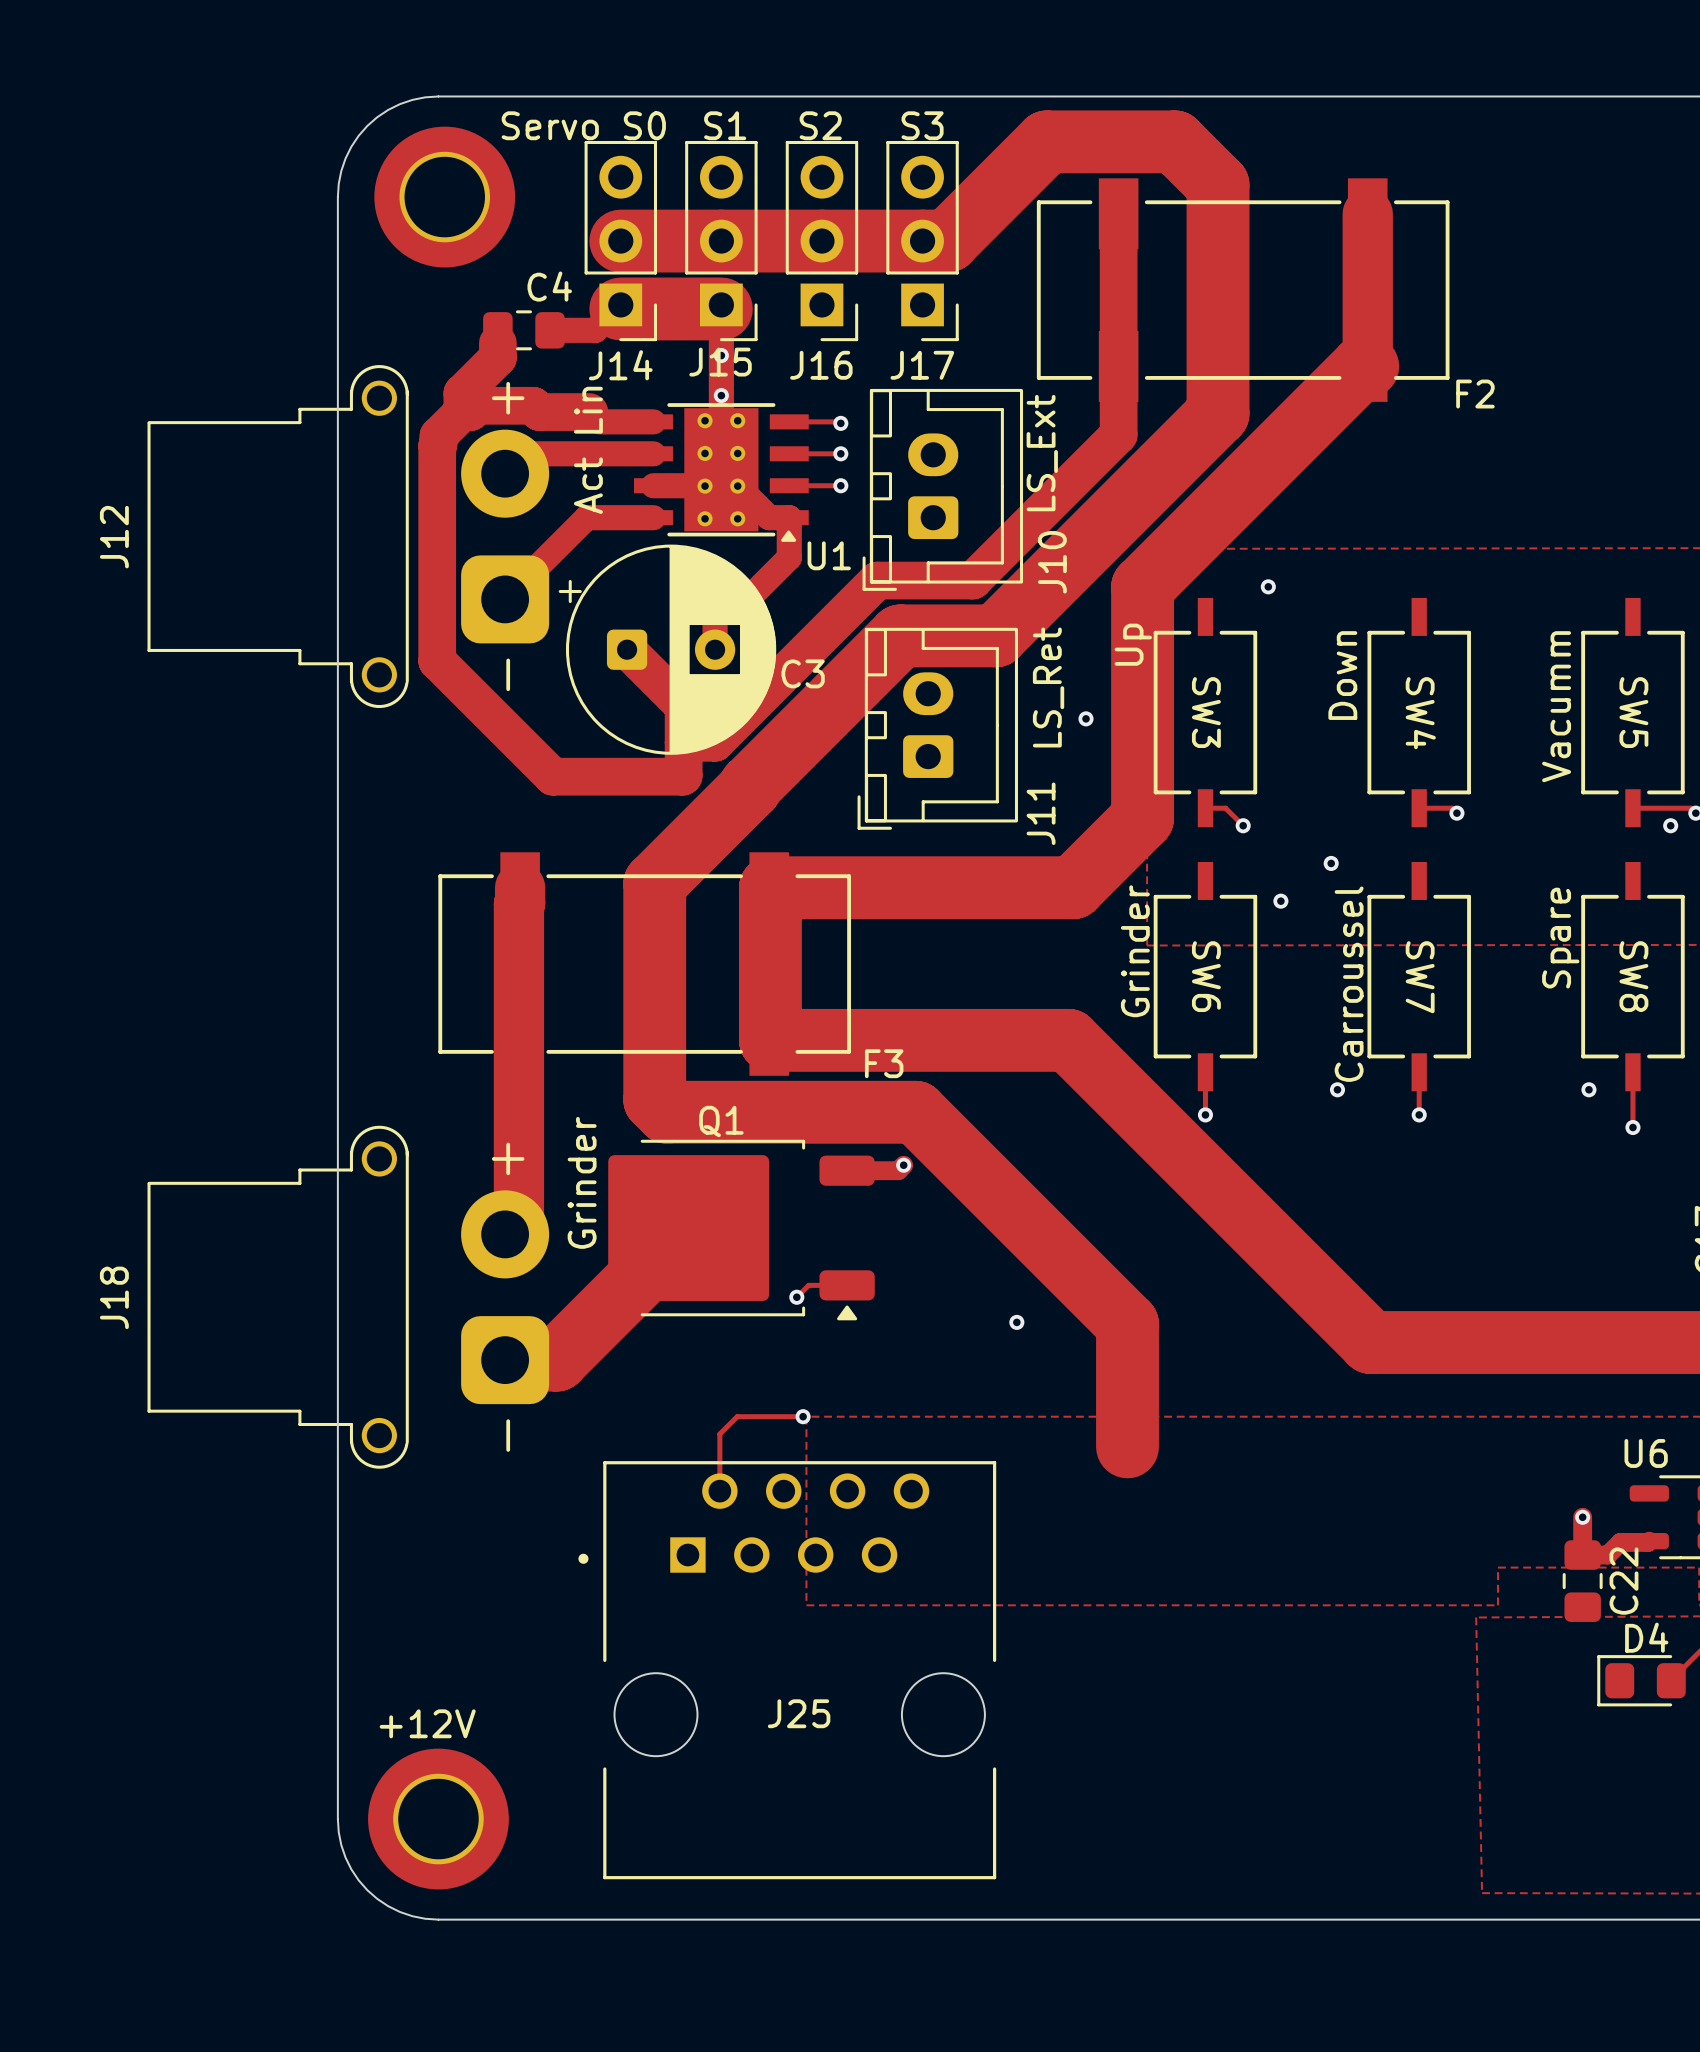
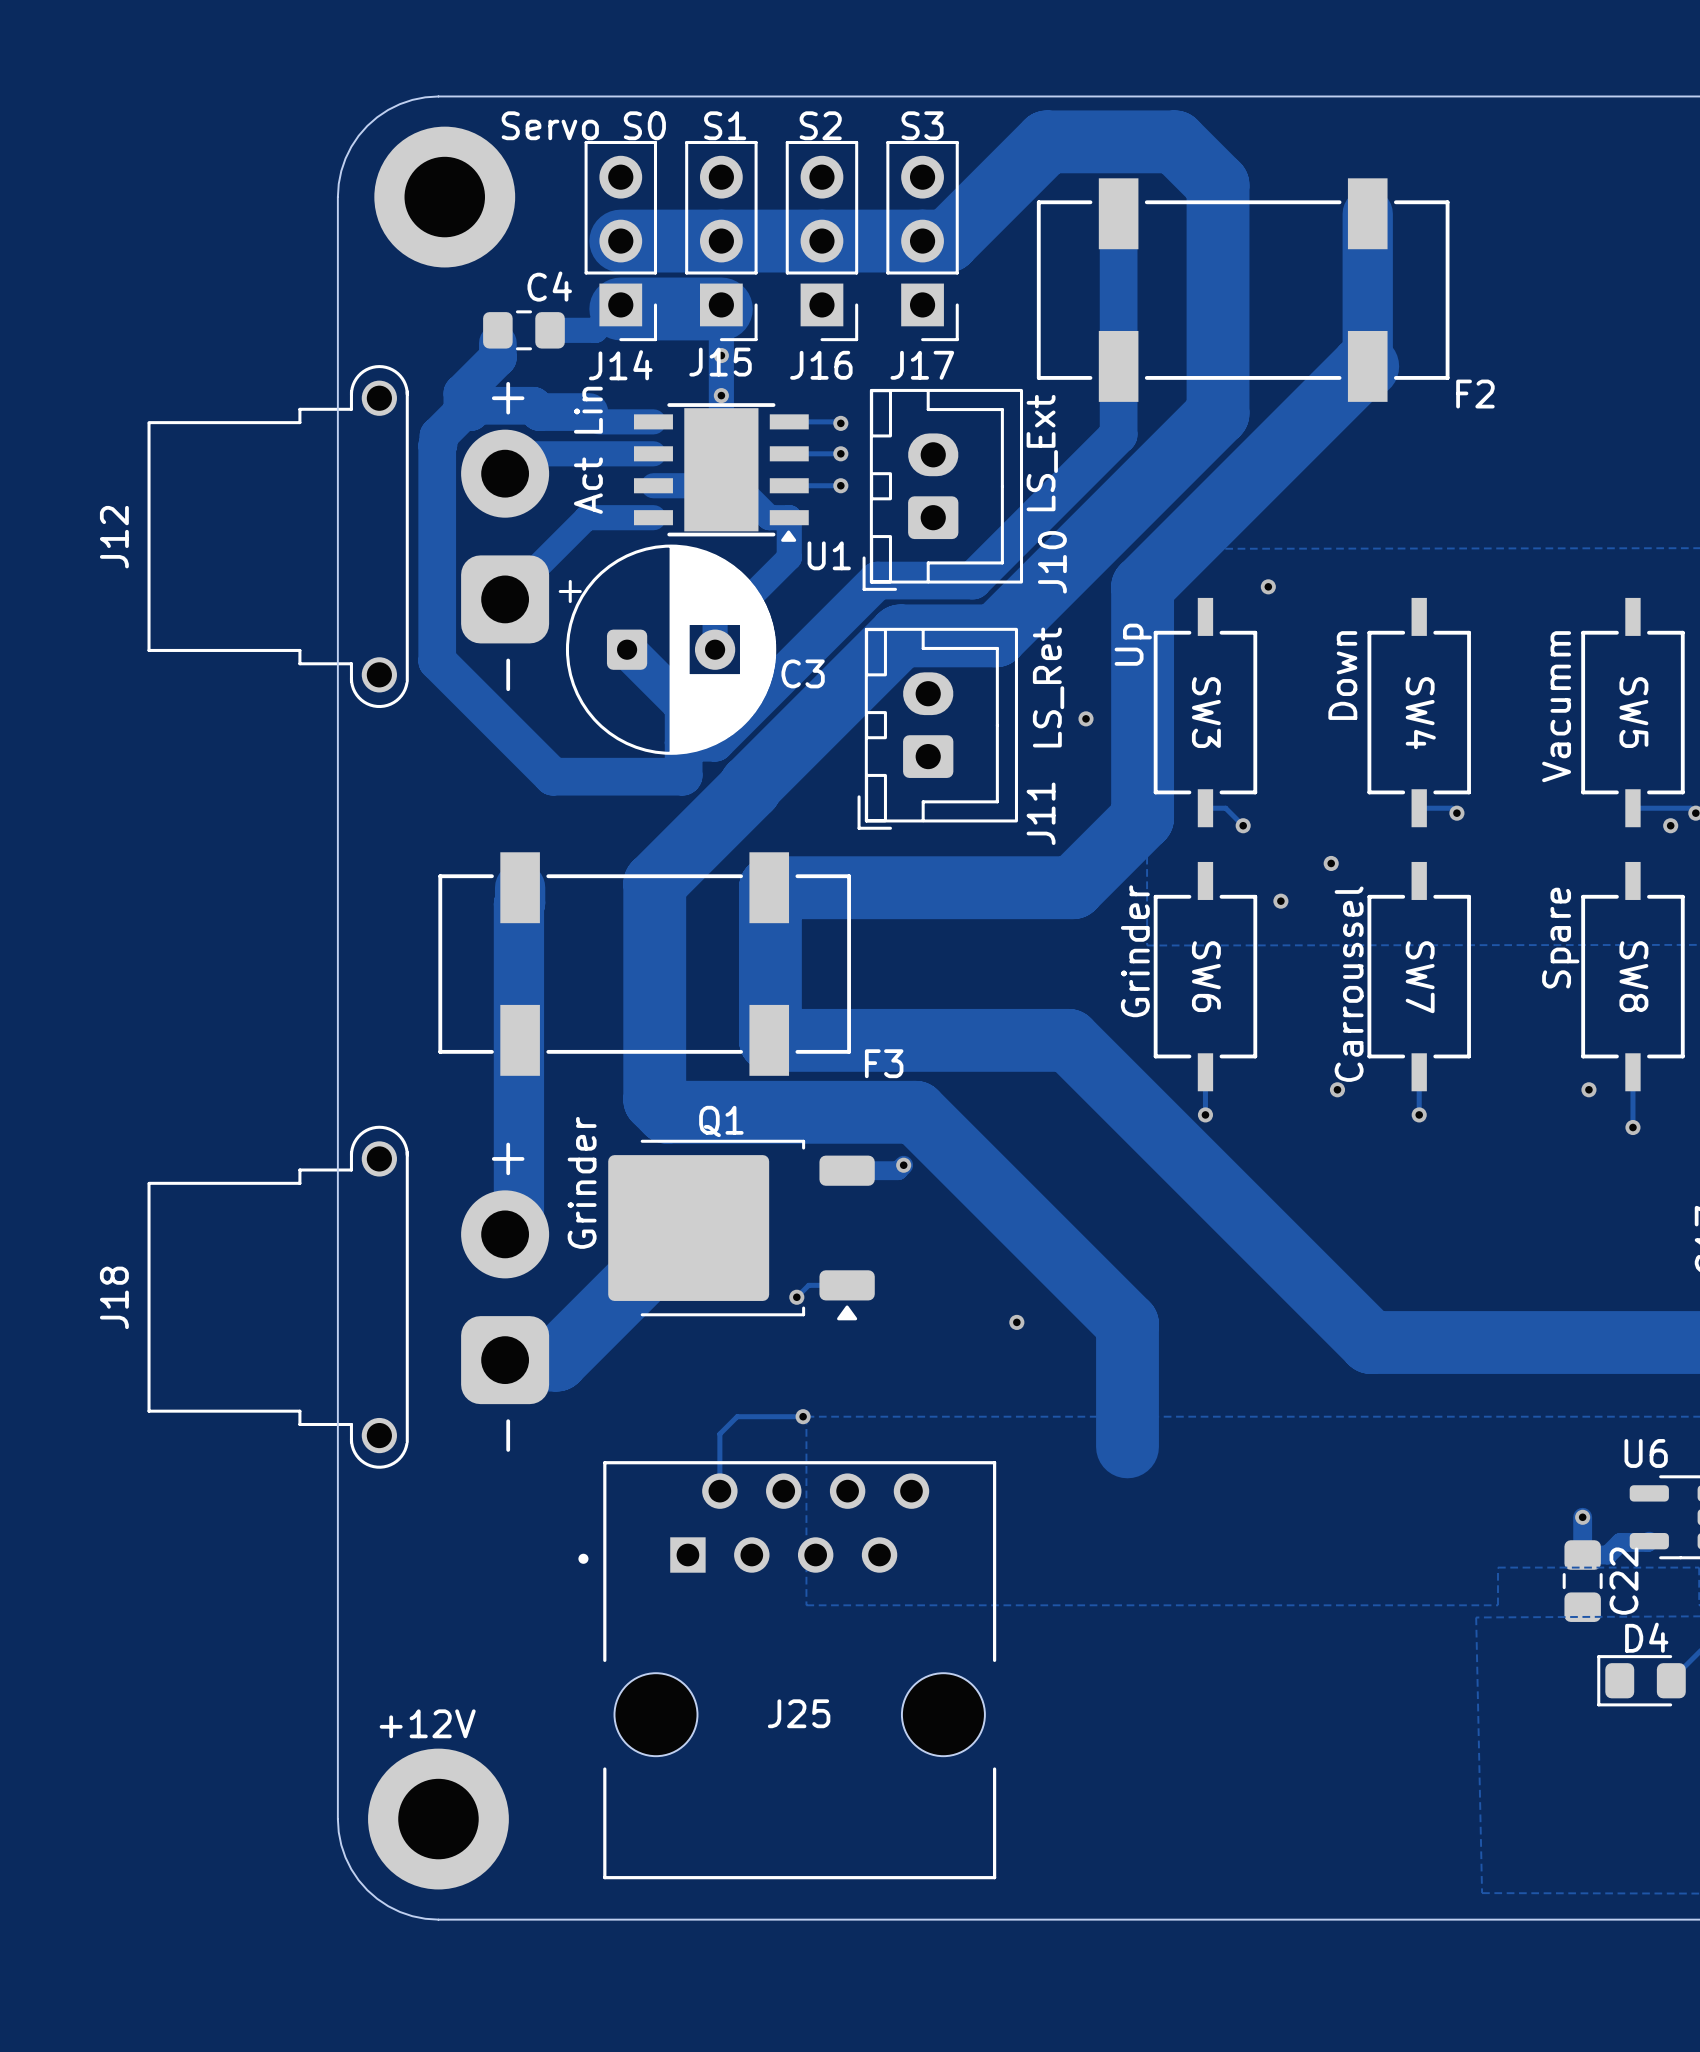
U1 footprint: [633, 403, 809, 542] -> [633, 403, 809, 542]

